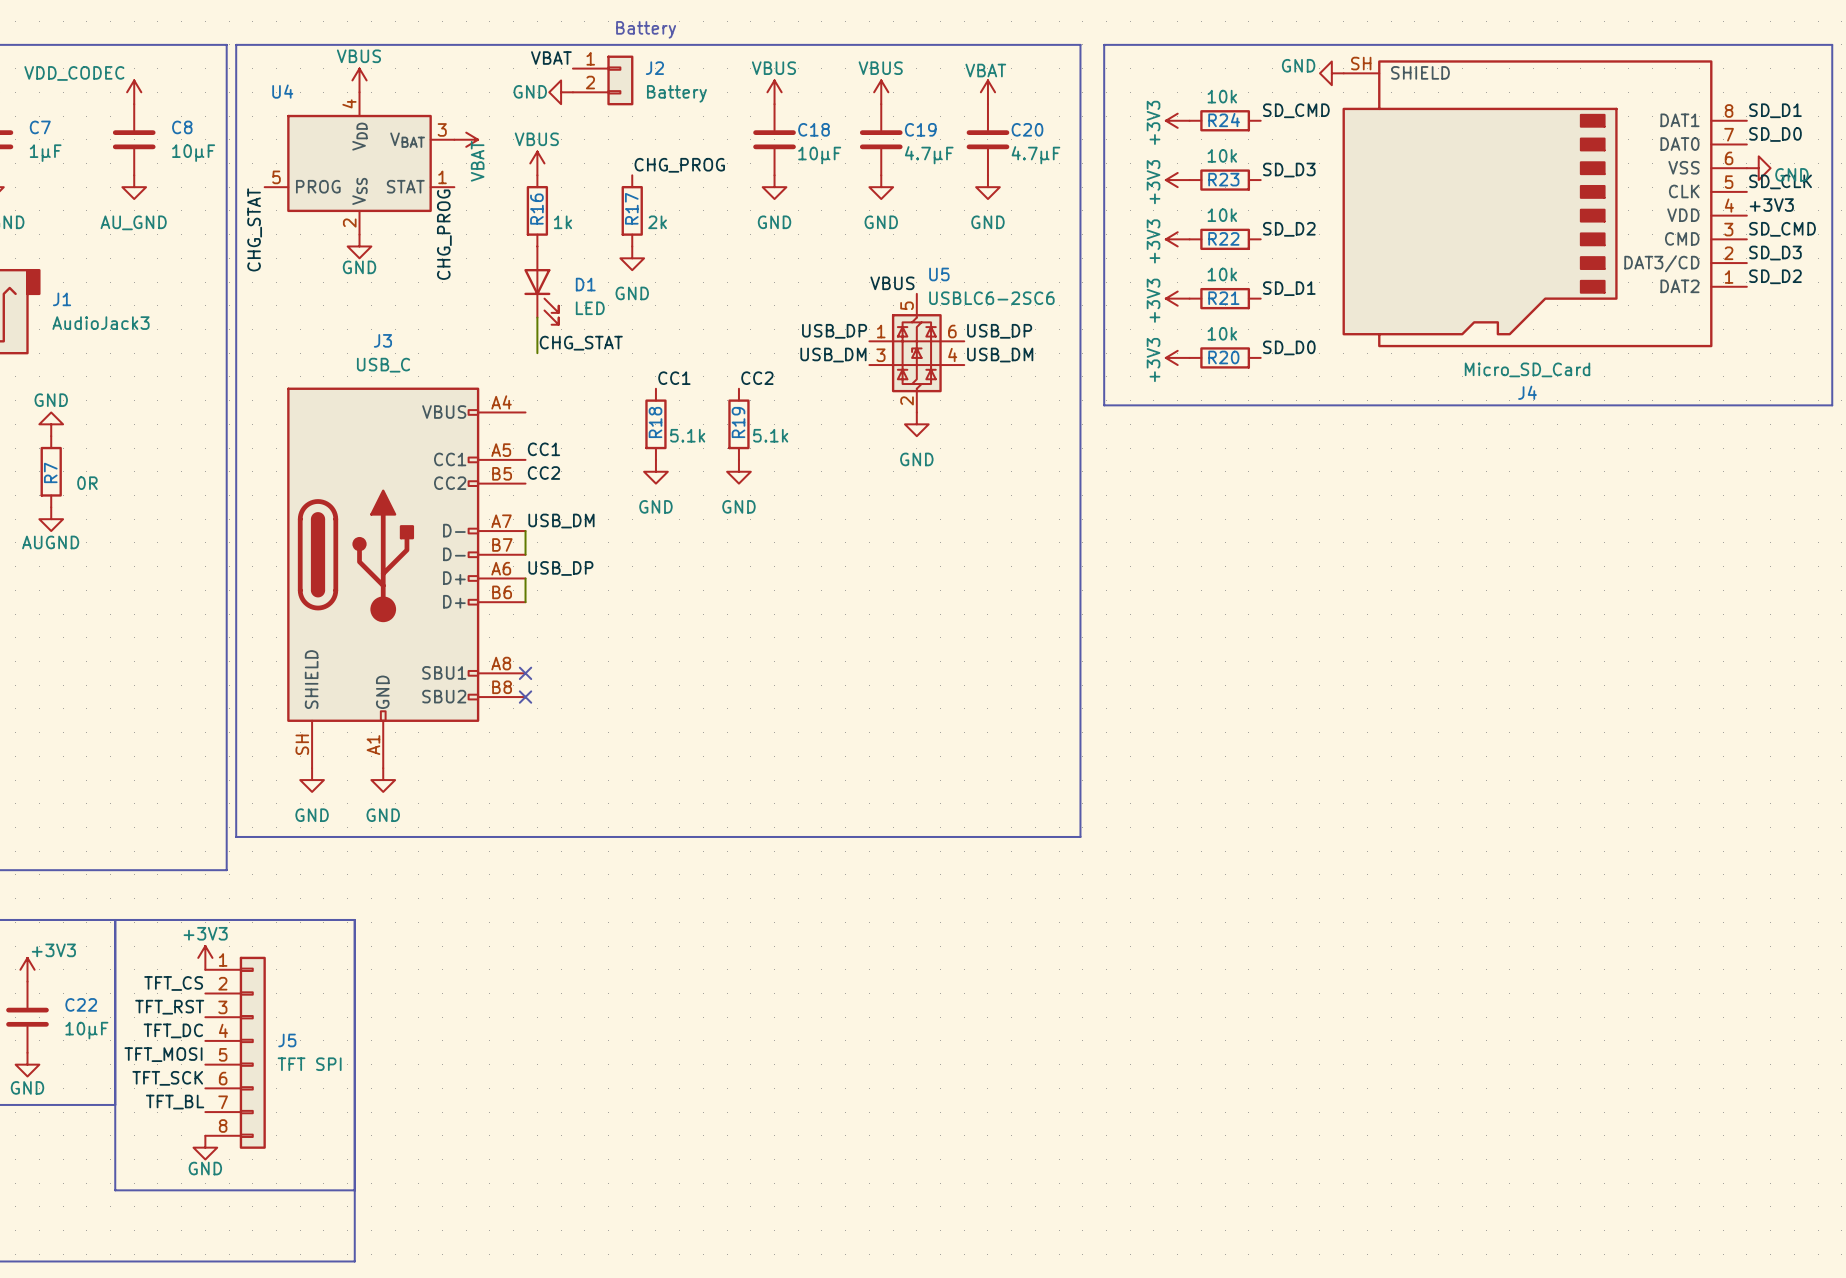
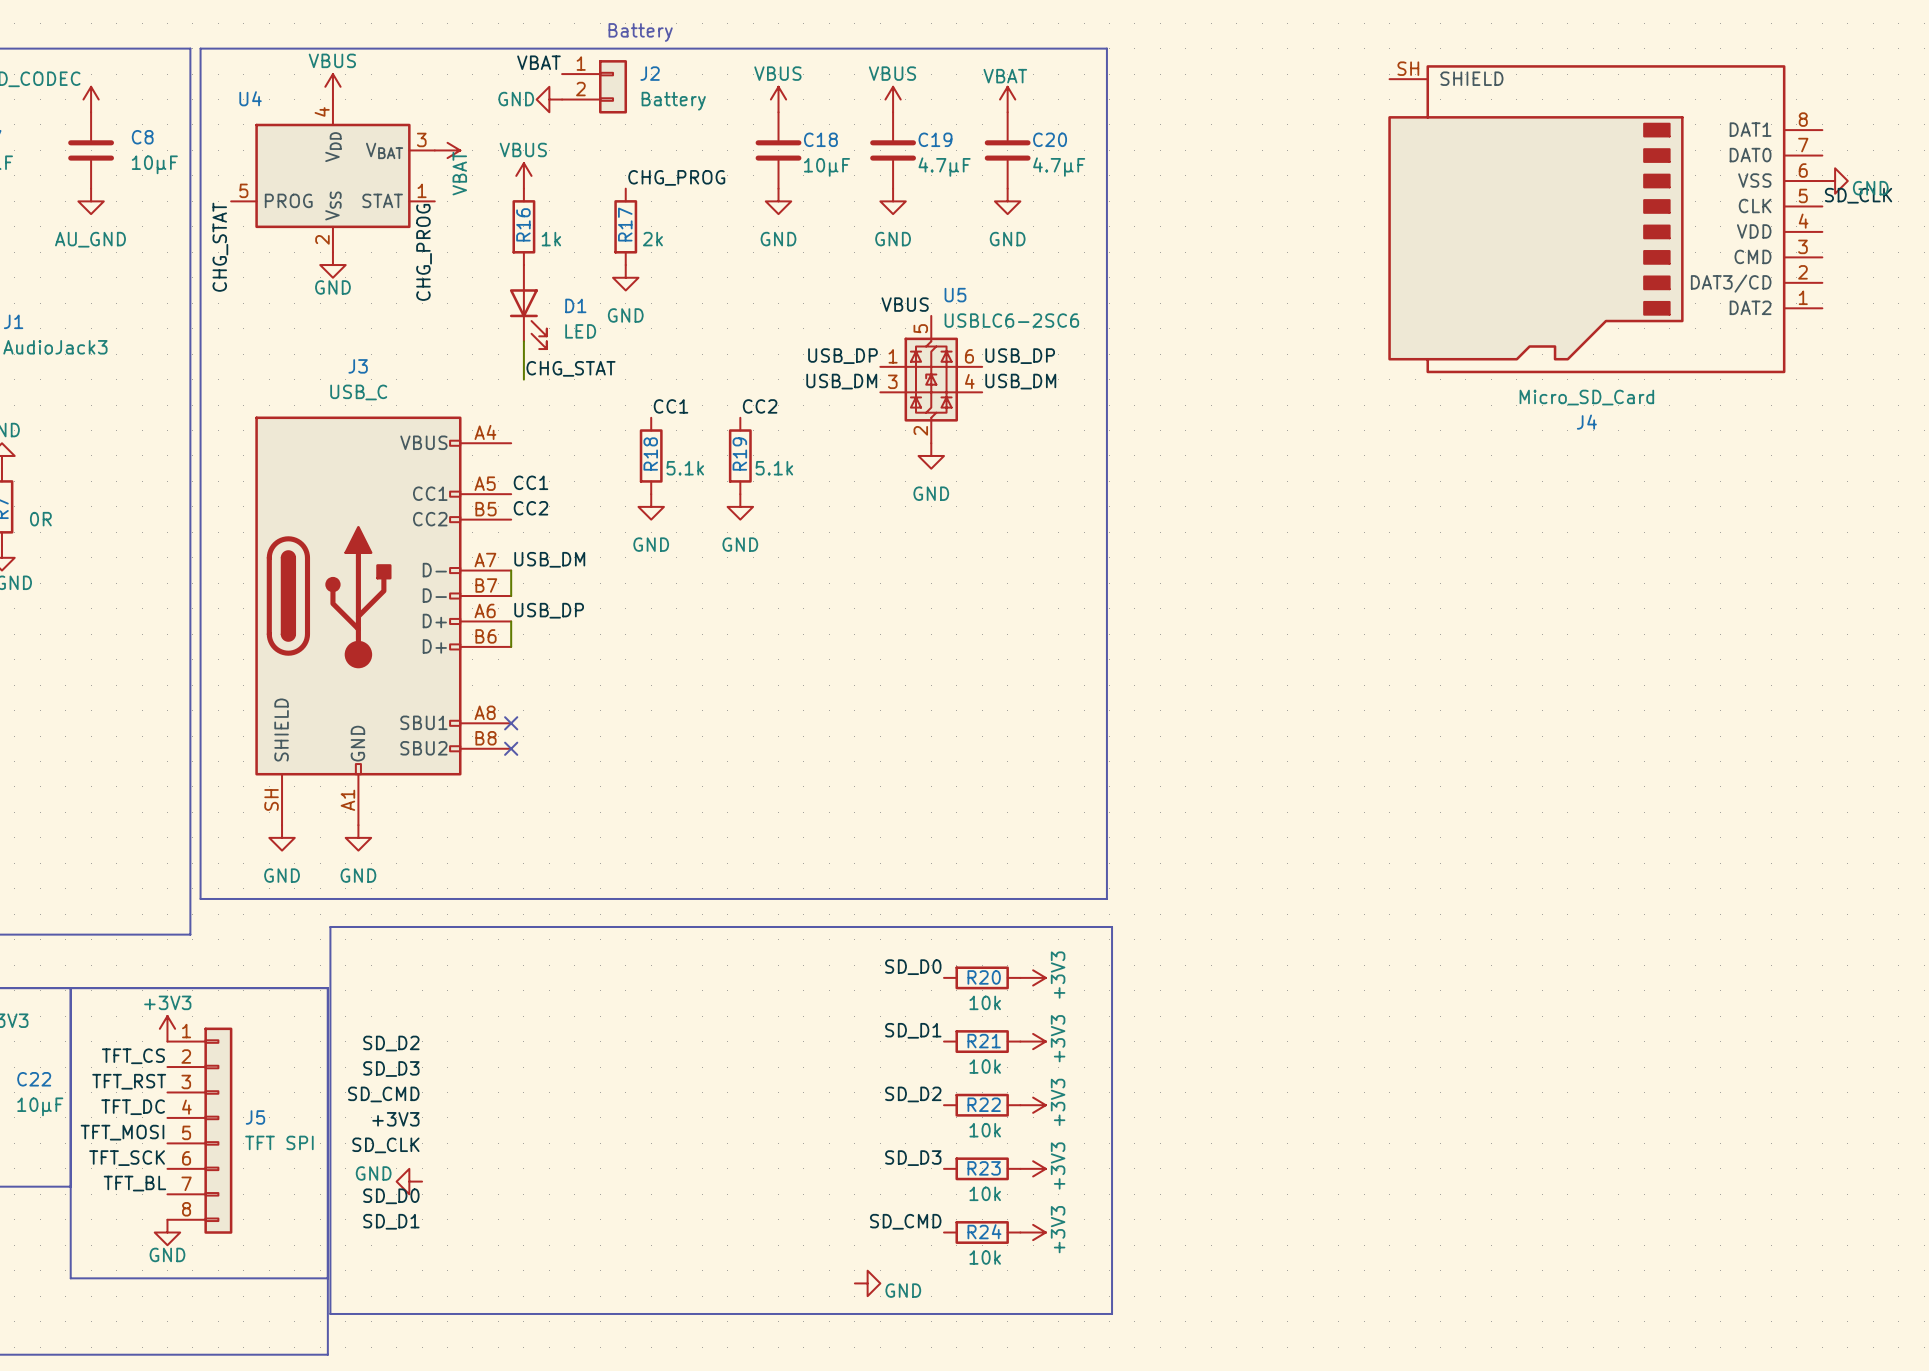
line: (1104, 44) (1832, 44) (1832, 405) (1104, 405) (1104, 44) -> none
power symbol: GND (1331, 73) -> none
R24 value position: 10k (1222, 96) -> 10k (985, 1257)
label: SD_CMD (1296, 110) -> none
label: SD_D1 (1775, 110) -> none
power symbol: +3V3 (1177, 120) -> none
R24 name position: R24 (1224, 120) -> R24 (984, 1231)
R24 position: (1225, 120) -> (982, 1232)
label: SD_D0 (1775, 134) -> none
R23 value position: 10k (1222, 155) -> 10k (985, 1193)
label: SD_D3 (1289, 170) -> none
R23 name position: R23 (1223, 179) -> R23 (984, 1168)
power symbol: +3V3 (1177, 180) -> none
R23 position: (1225, 180) -> (982, 1168)
label: +3V3 (1771, 205) -> none
R22 value position: 10k (1222, 215) -> 10k (985, 1130)
label: SD_D2 (1289, 229) -> none
label: SD_CMD (1782, 229) -> none
R22 name position: R22 (1223, 238) -> R22 (984, 1104)
power symbol: +3V3 (1177, 239) -> none
R22 position: (1225, 239) -> (982, 1105)
label: SD_D3 (1775, 253) -> none
R21 value position: 10k (1222, 274) -> 10k (985, 1066)
label: SD_D2 (1775, 276) -> none
label: SD_D1 (1289, 288) -> none
power symbol: +3V3 (1177, 298) -> none
R21 name position: R21 (1223, 298) -> R21 (984, 1041)
R21 position: (1225, 298) -> (982, 1041)
R20 value position: 10k (1222, 333) -> 10k (985, 1002)
label: SD_D0 (1289, 347) -> none
power symbol: +3V3 (1177, 357) -> none
R20 name position: R20 (1223, 357) -> R20 (984, 977)
R20 position: (1225, 357) -> (982, 977)
line: none -> (330, 926) (1112, 926) (1112, 1313) (330, 1313) (330, 926)
label: none -> SD_D0 (913, 967)
power symbol: none -> +3V3 (1033, 977)
label: none -> SD_D1 (913, 1030)
power symbol: none -> +3V3 (1033, 1041)
label: none -> SD_D2 (391, 1043)
label: none -> SD_D3 (391, 1068)
label: none -> SD_CMD (383, 1094)
label: none -> SD_D2 (913, 1094)
power symbol: none -> +3V3 (1033, 1105)
label: none -> +3V3 (395, 1119)
label: none -> SD_CLK (385, 1145)
label: none -> SD_D3 (913, 1158)
power symbol: none -> +3V3 (1033, 1168)
power symbol: none -> GND (409, 1181)
label: none -> SD_D0 (391, 1196)
label: none -> SD_D1 (391, 1221)
label: none -> SD_CMD (905, 1221)
power symbol: none -> +3V3 (1033, 1232)
power symbol: none -> GND (867, 1283)

